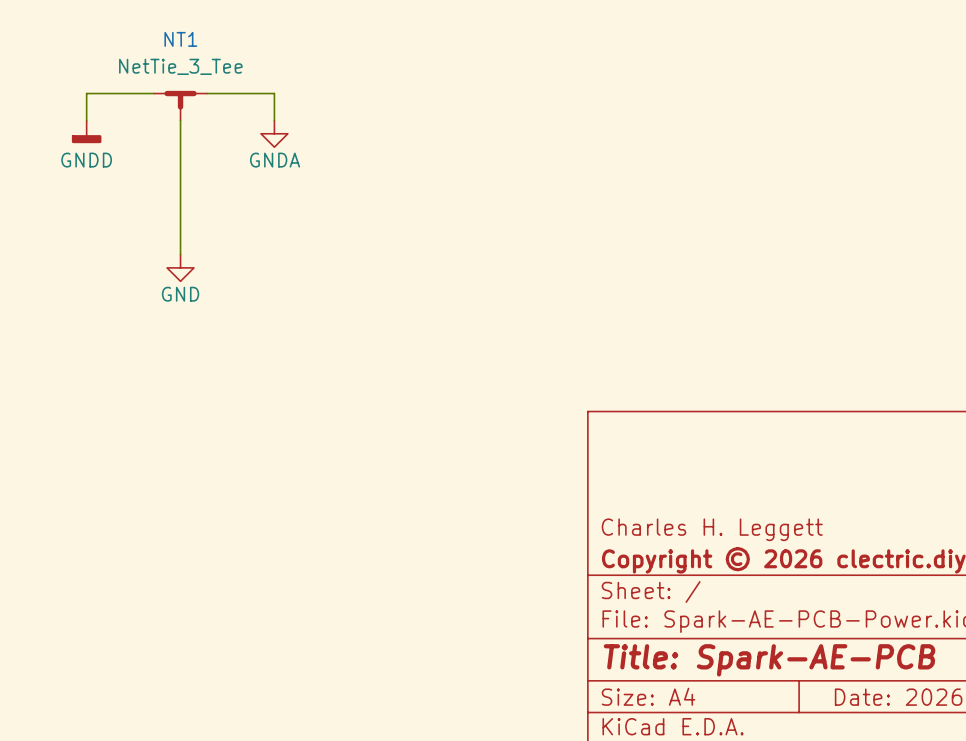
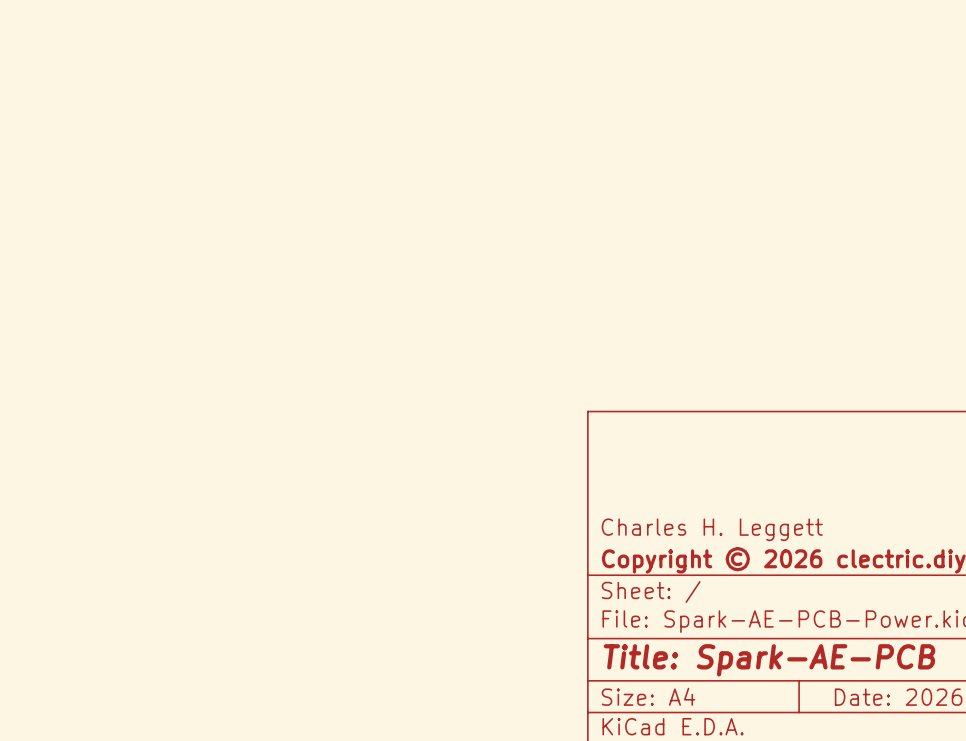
wire: (153, 93) (86, 93) (86, 120) -> none
wire: (207, 93) (274, 93) (274, 120) -> none
NT1: NetTie_3_Tee (180, 106) -> none
wire: (180, 120) (180, 254) -> none
power symbol: GNDD (86, 131) -> none
power symbol: GNDA (274, 133) -> none
power symbol: GND (180, 267) -> none

